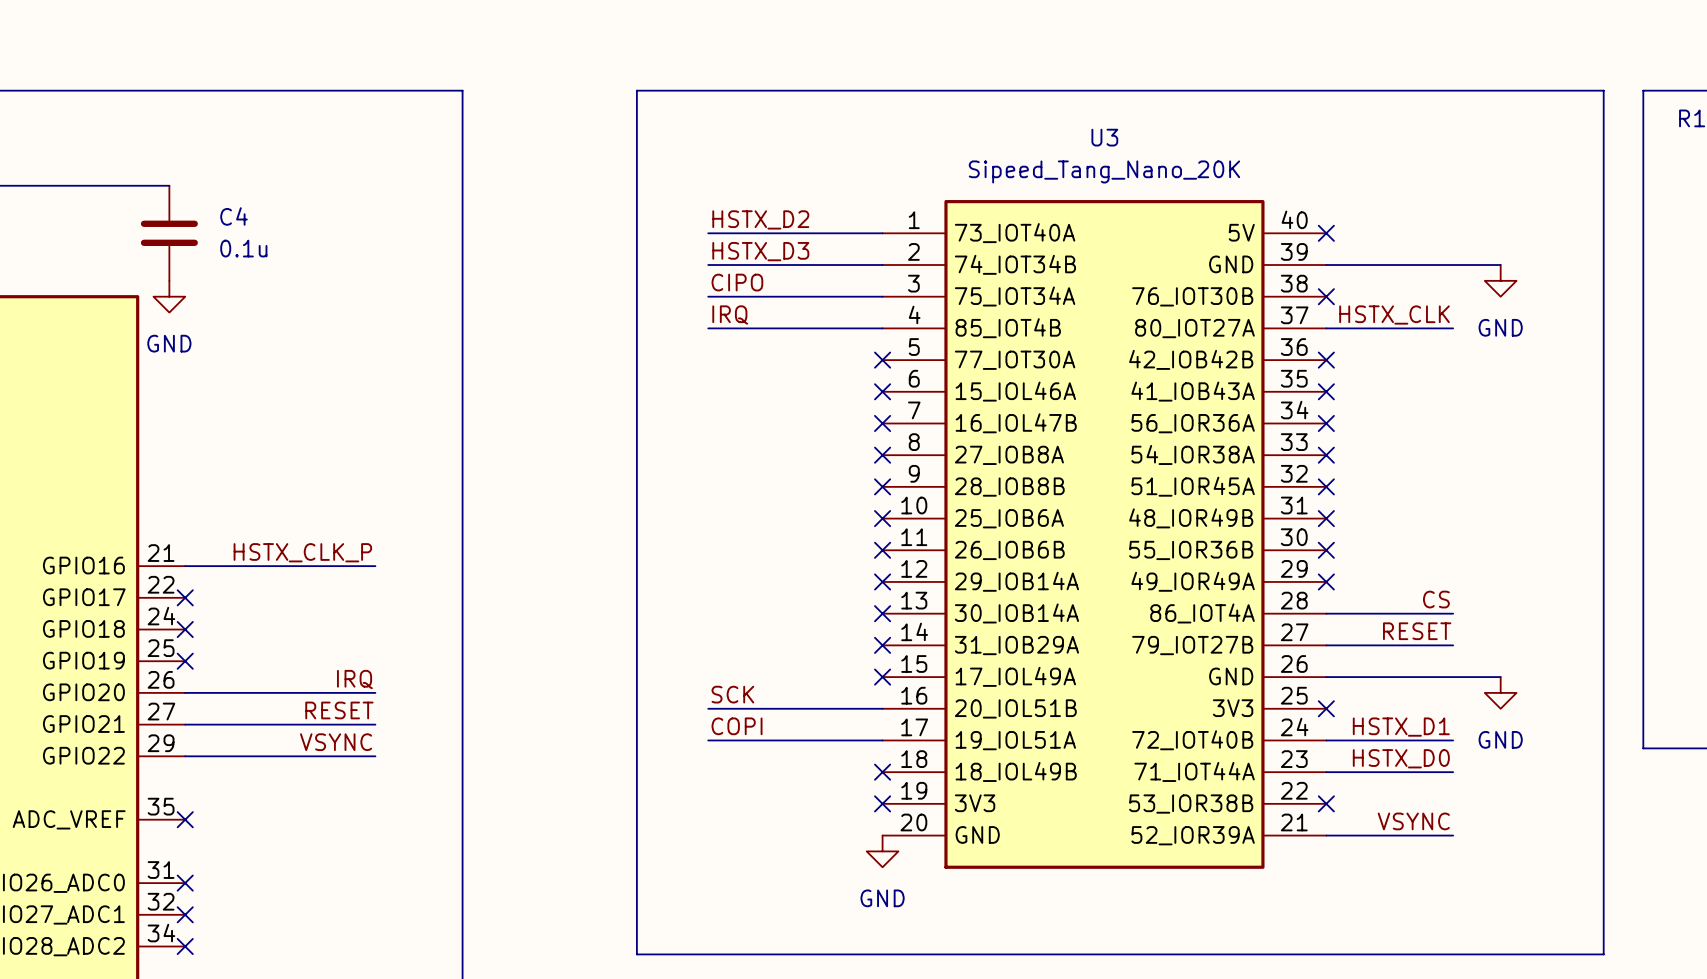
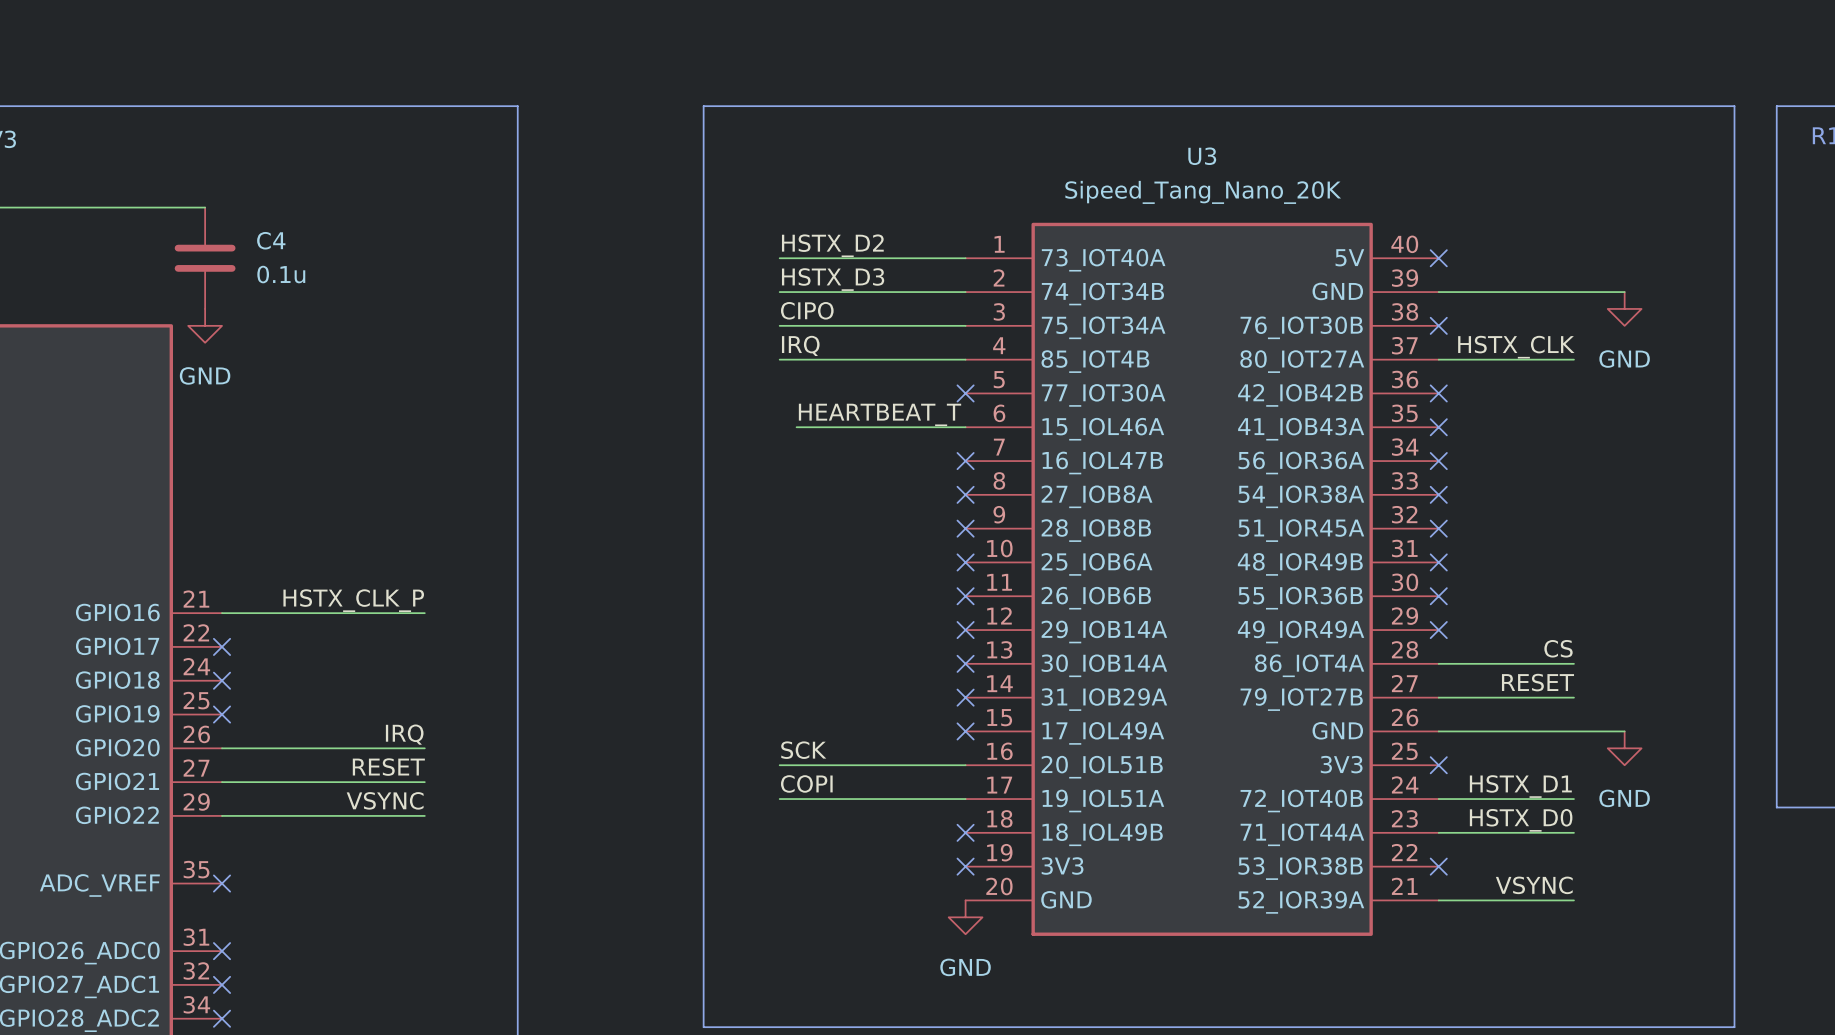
label: none -> HEARTBEAT_T (880, 414)
wire: none -> (796, 427) (965, 427)
no-connect mark: (882, 391) -> none

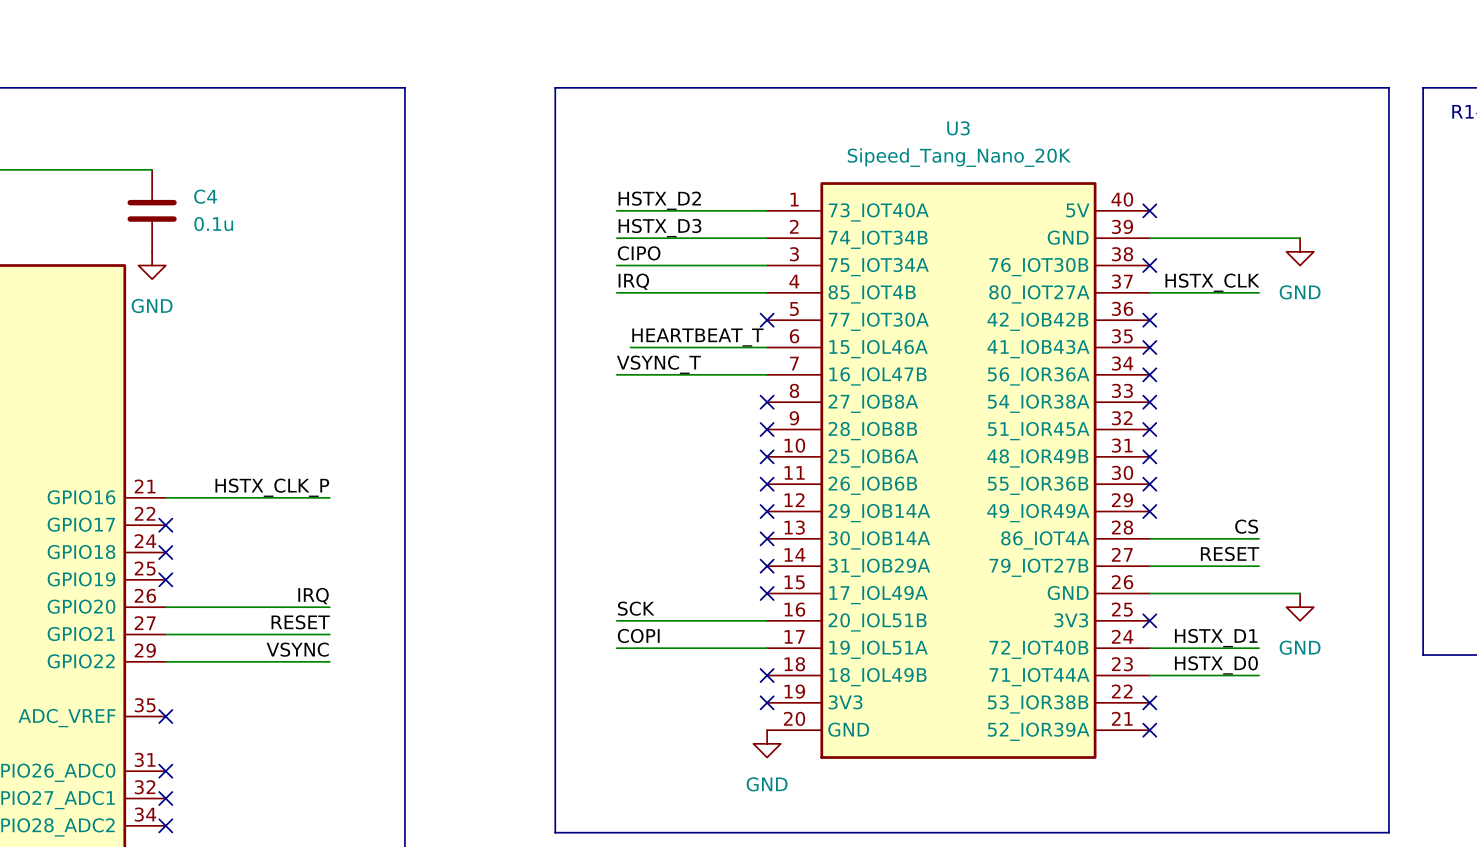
label: none -> VSYNC_T (658, 364)
wire: none -> (616, 374) (767, 374)
no-connect mark: (965, 461) -> none
label: VSYNC (1534, 885) -> none
wire: (1438, 900) (1573, 900) -> none
no-connect mark: none -> (1149, 730)

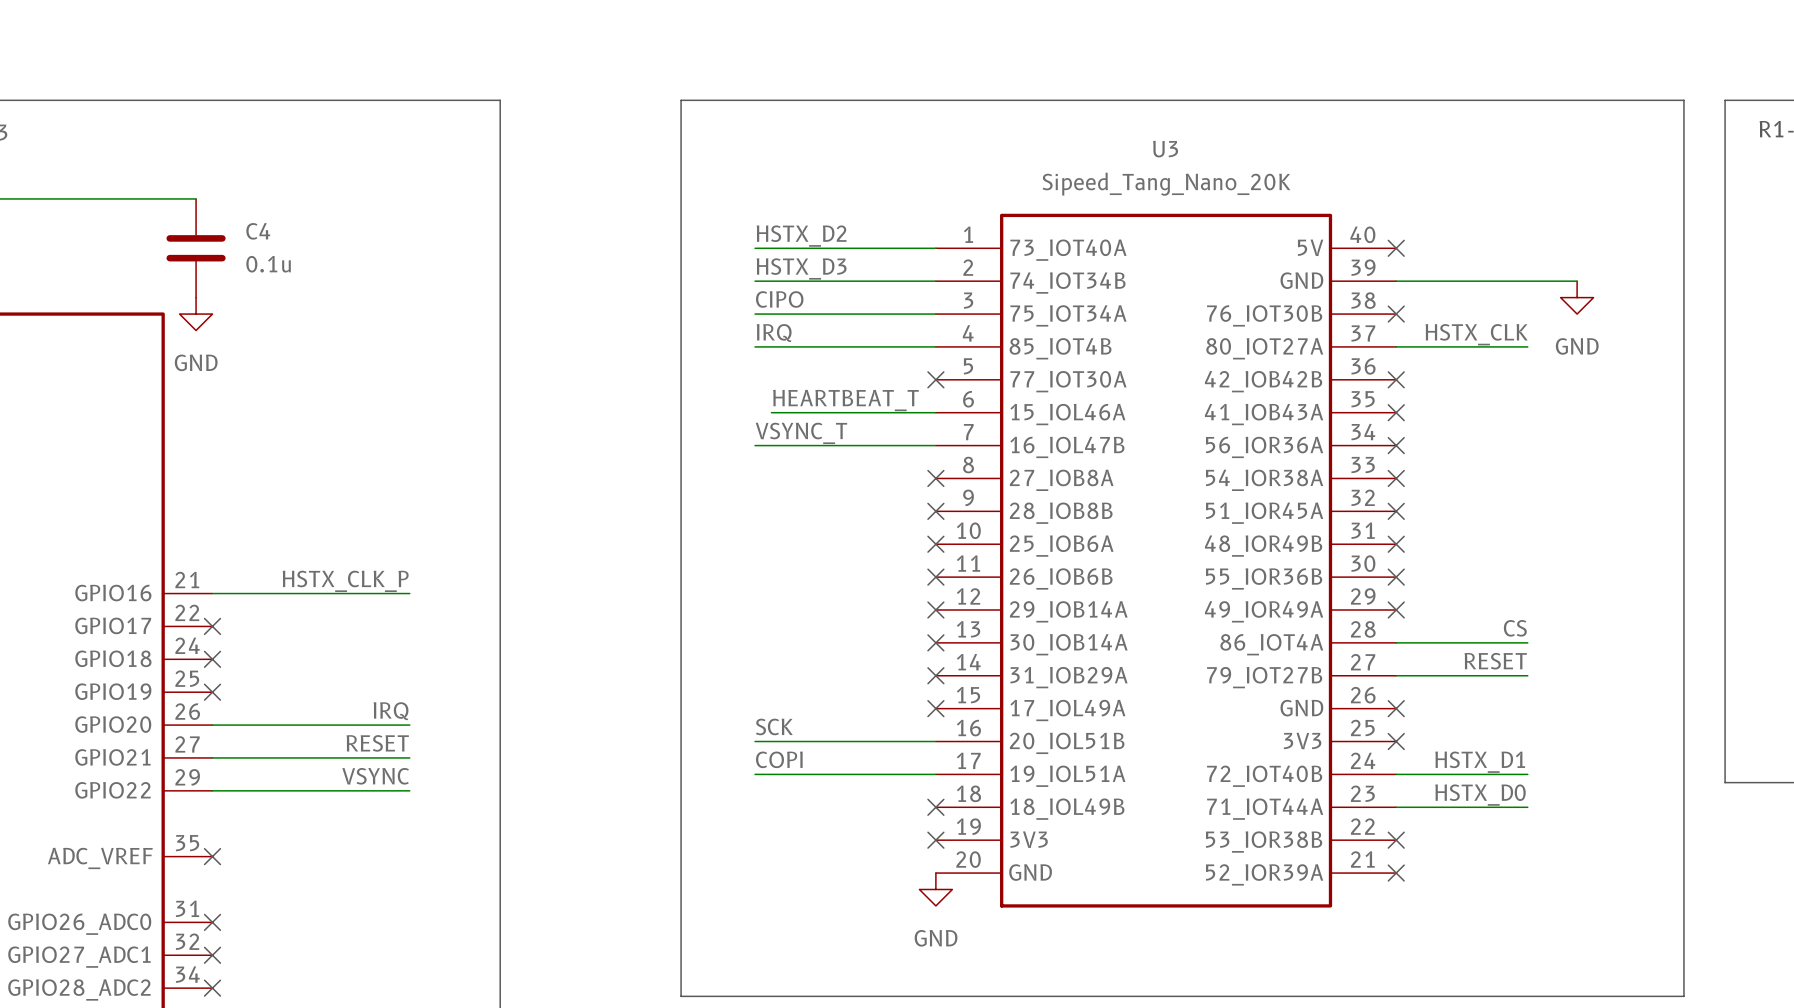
wire: (1149, 593) (1300, 593) -> none
no-connect mark: none -> (1396, 708)
power symbol: GND (1300, 607) -> none

